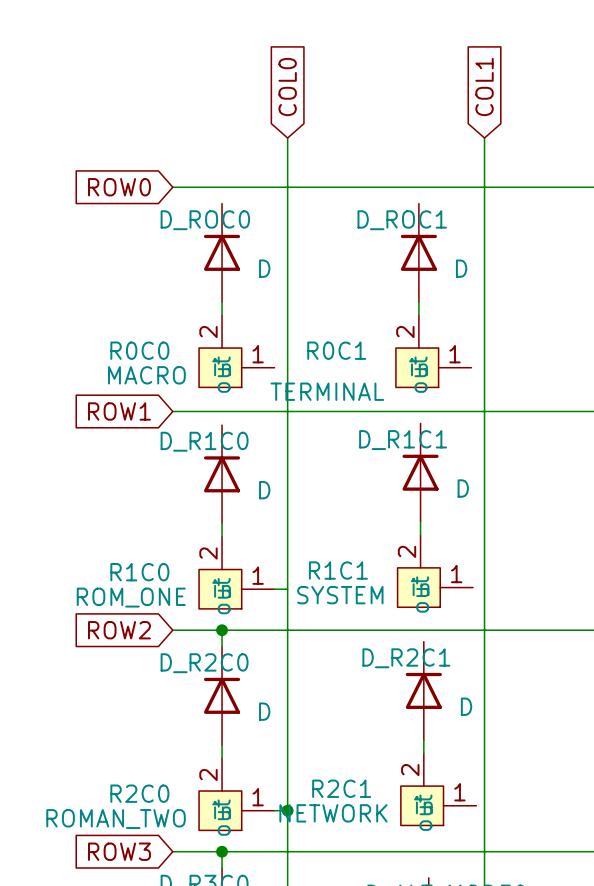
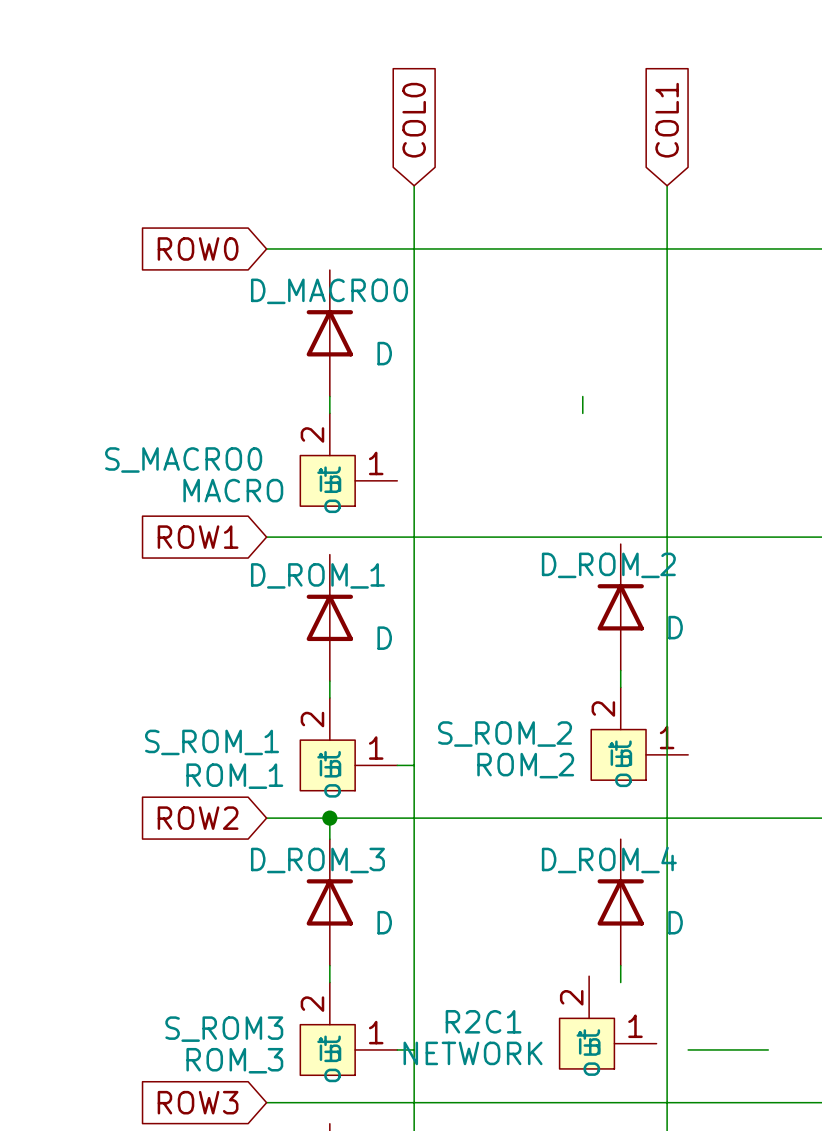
D_ROC0 name: D_ROC0 (205, 220) -> D_MACRO0 (329, 291)
D_ROC1: D (418, 252) -> none
R0C0 name: R0C0 (139, 350) -> S_MACRO0 (183, 459)
R0C1: TERMINAL (433, 351) -> none
D_R1C0 name: D_R1C0 (204, 441) -> D_ROM_1 (317, 575)
D_ROM_2: none -> D (620, 607)
D_R1C1: D (420, 472) -> none
wire: (420, 521) (420, 535) -> (620, 670) (620, 687)
S_ROM_2: none -> ROM_2 (639, 733)
R1C1: SYSTEM (435, 571) -> none
R1C0 name: R1C0 (139, 572) -> S_ROM_1 (212, 742)
R1C0 value: ROM_ONE (131, 597) -> ROM_1 (234, 776)
D_R2C0 name: D_R2C0 (204, 663) -> D_ROM_3 (317, 860)
D_R2C1: D (423, 690) -> none
D_ROM_4: none -> D (620, 902)
wire: (423, 740) (423, 753) -> (620, 965) (620, 982)
R2C0 name: R2C0 (139, 793) -> S_ROM3 (224, 1029)
junction: (287, 810) -> none
wire: none -> (688, 1049) (768, 1049)
R2C0 value: ROMAN_TWO (116, 819) -> ROM_3 (234, 1060)
wire: (222, 851) (222, 868) -> none
junction: (222, 851) -> none

